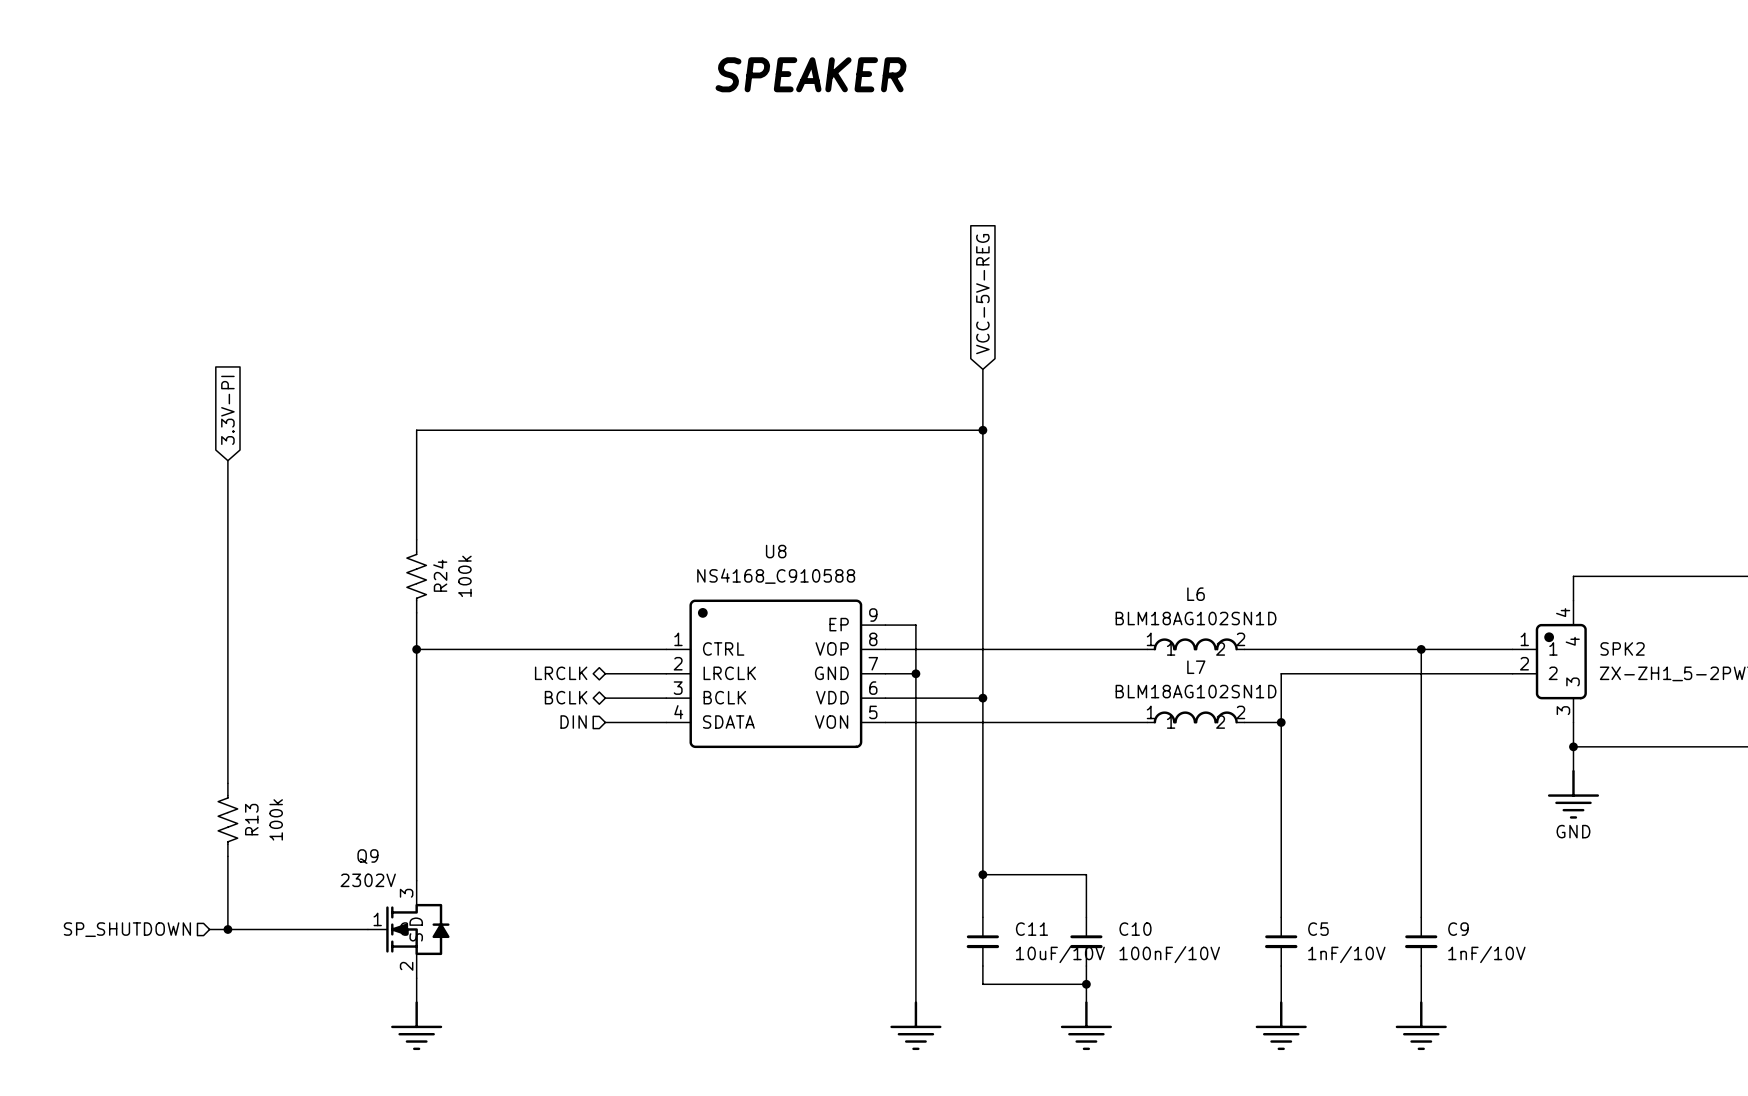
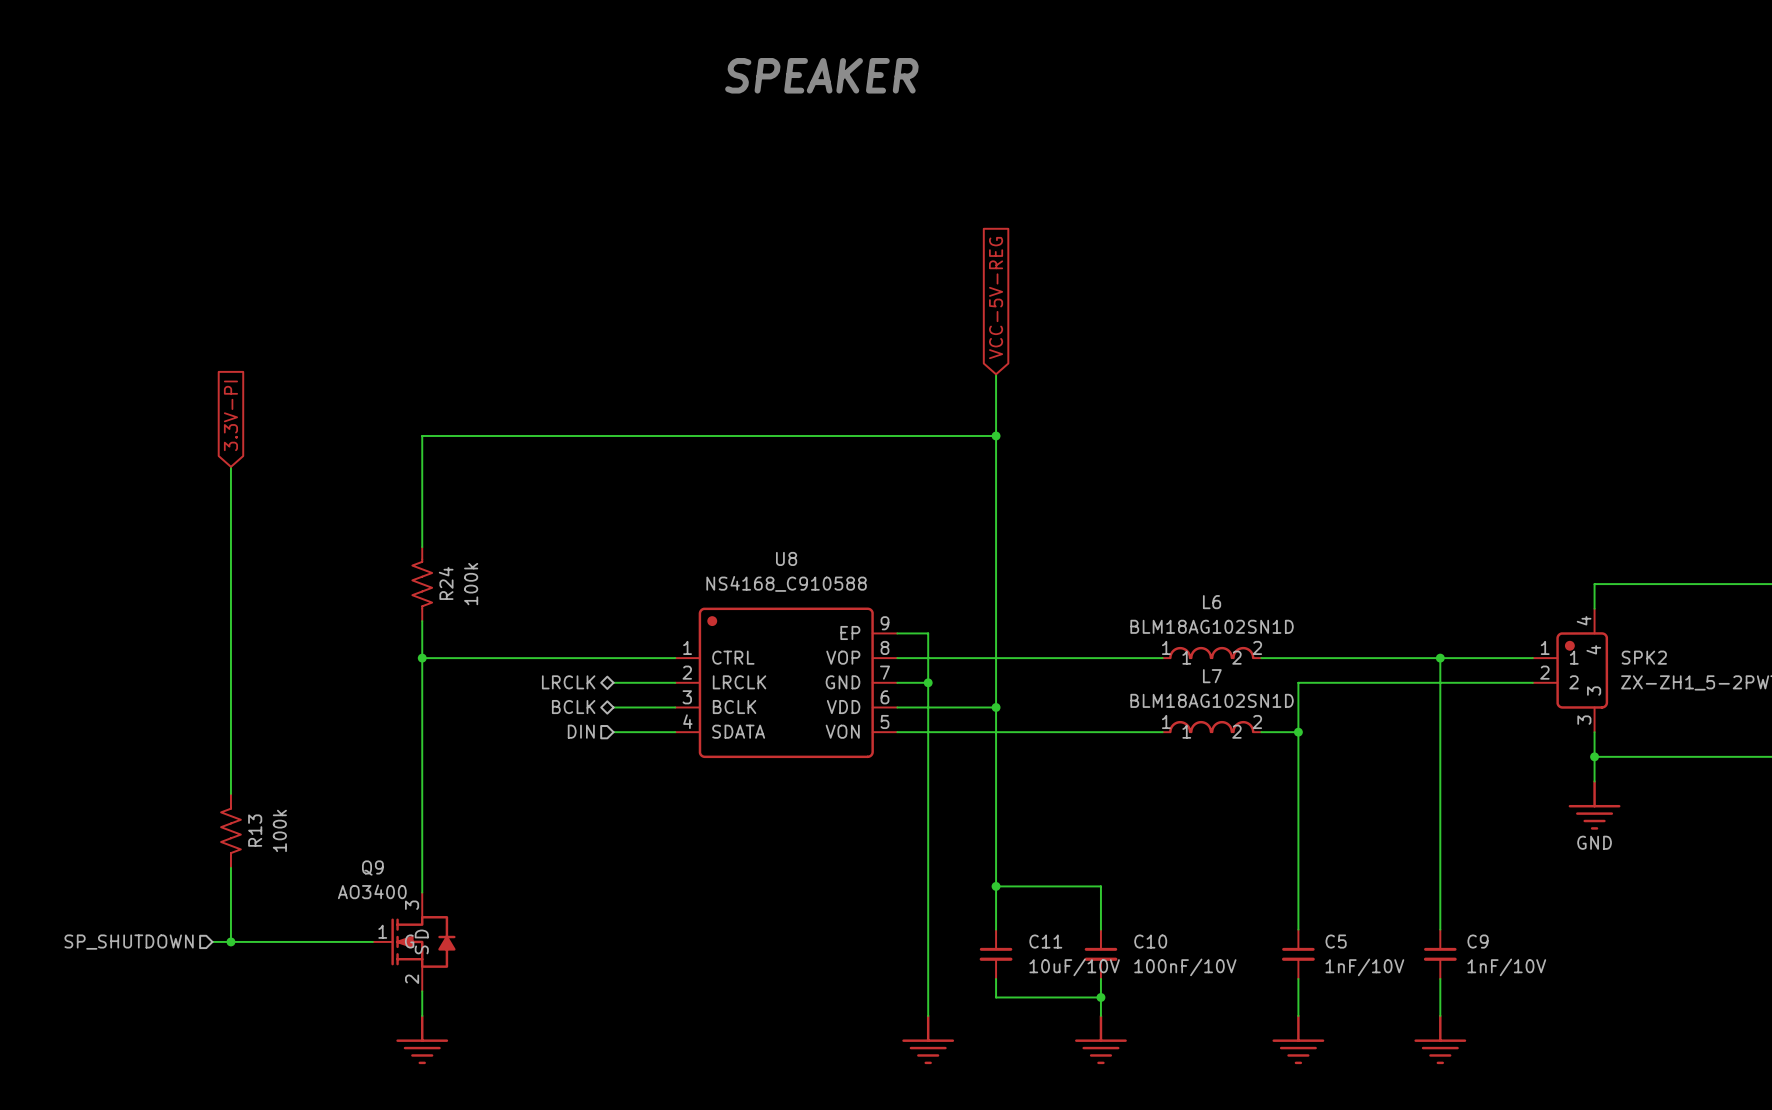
Q9 value: 2302V (368, 880) -> AO3400 (372, 891)

